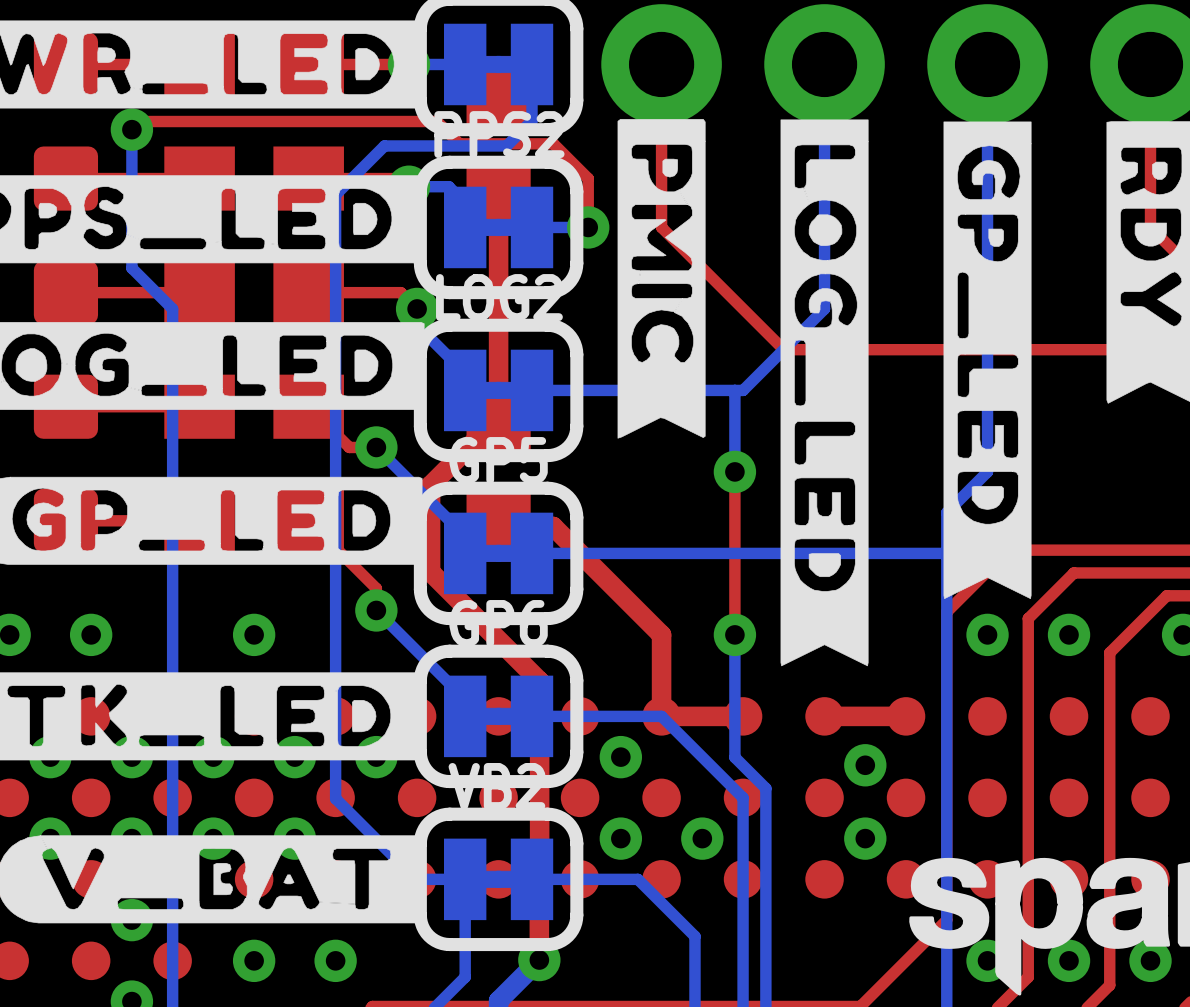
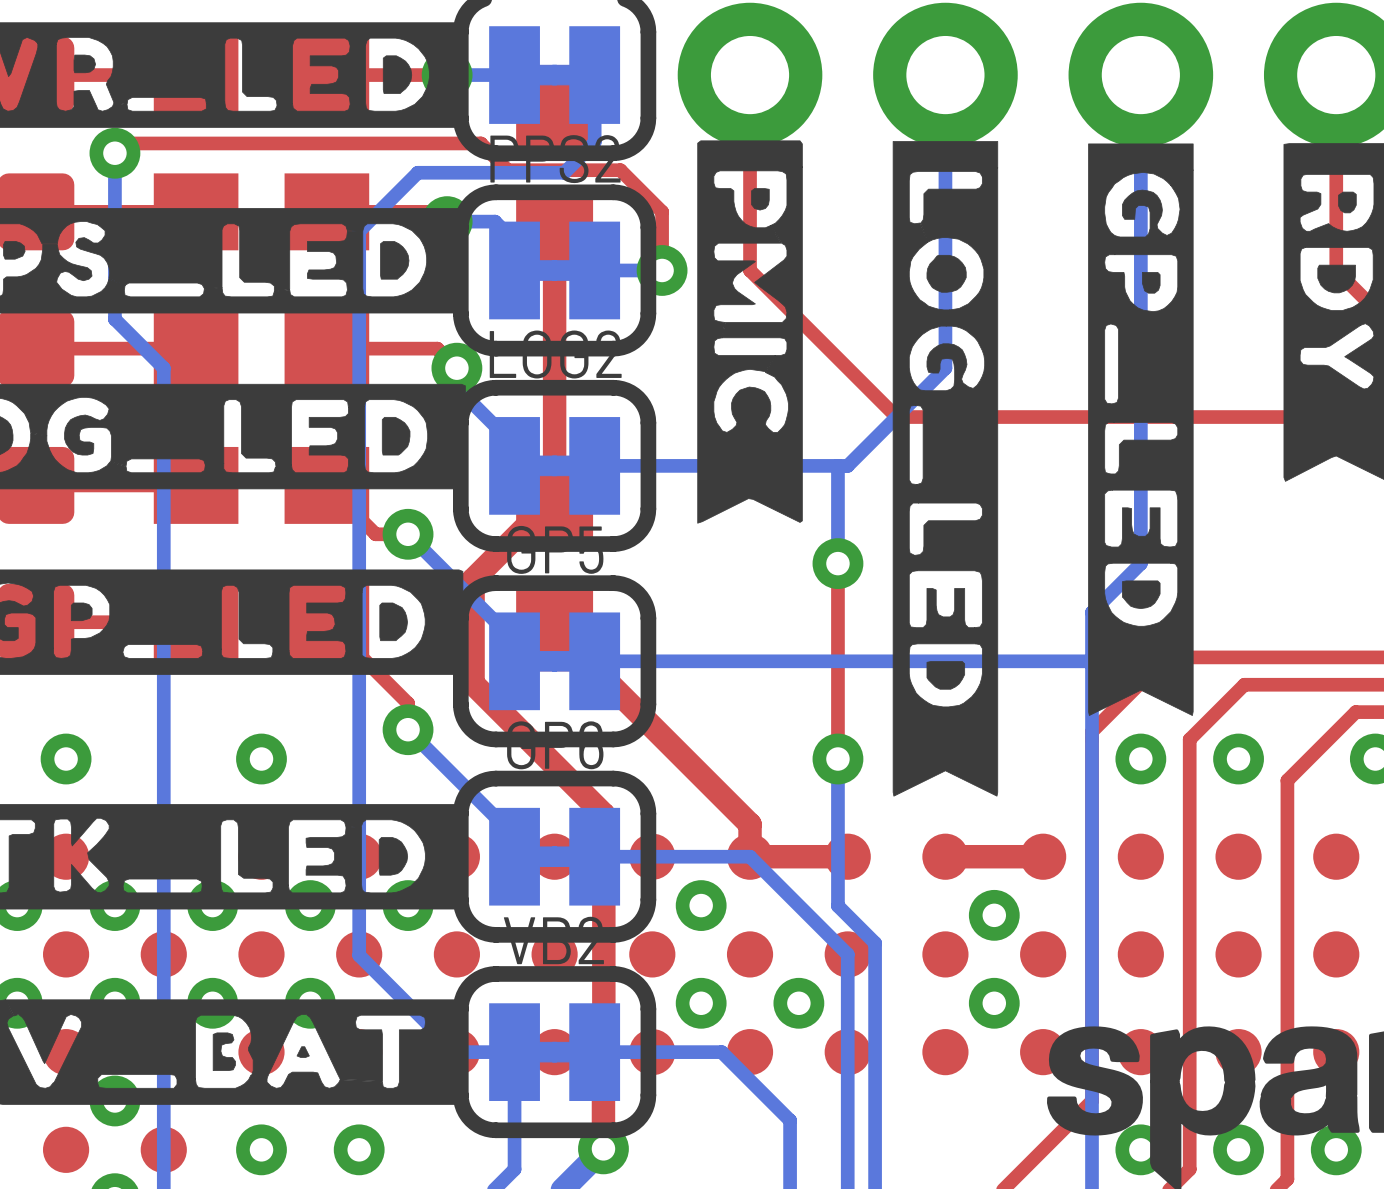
top track: (498, 526) (553, 526) (661, 634) (661, 689) -> (554, 628) (750, 824)

